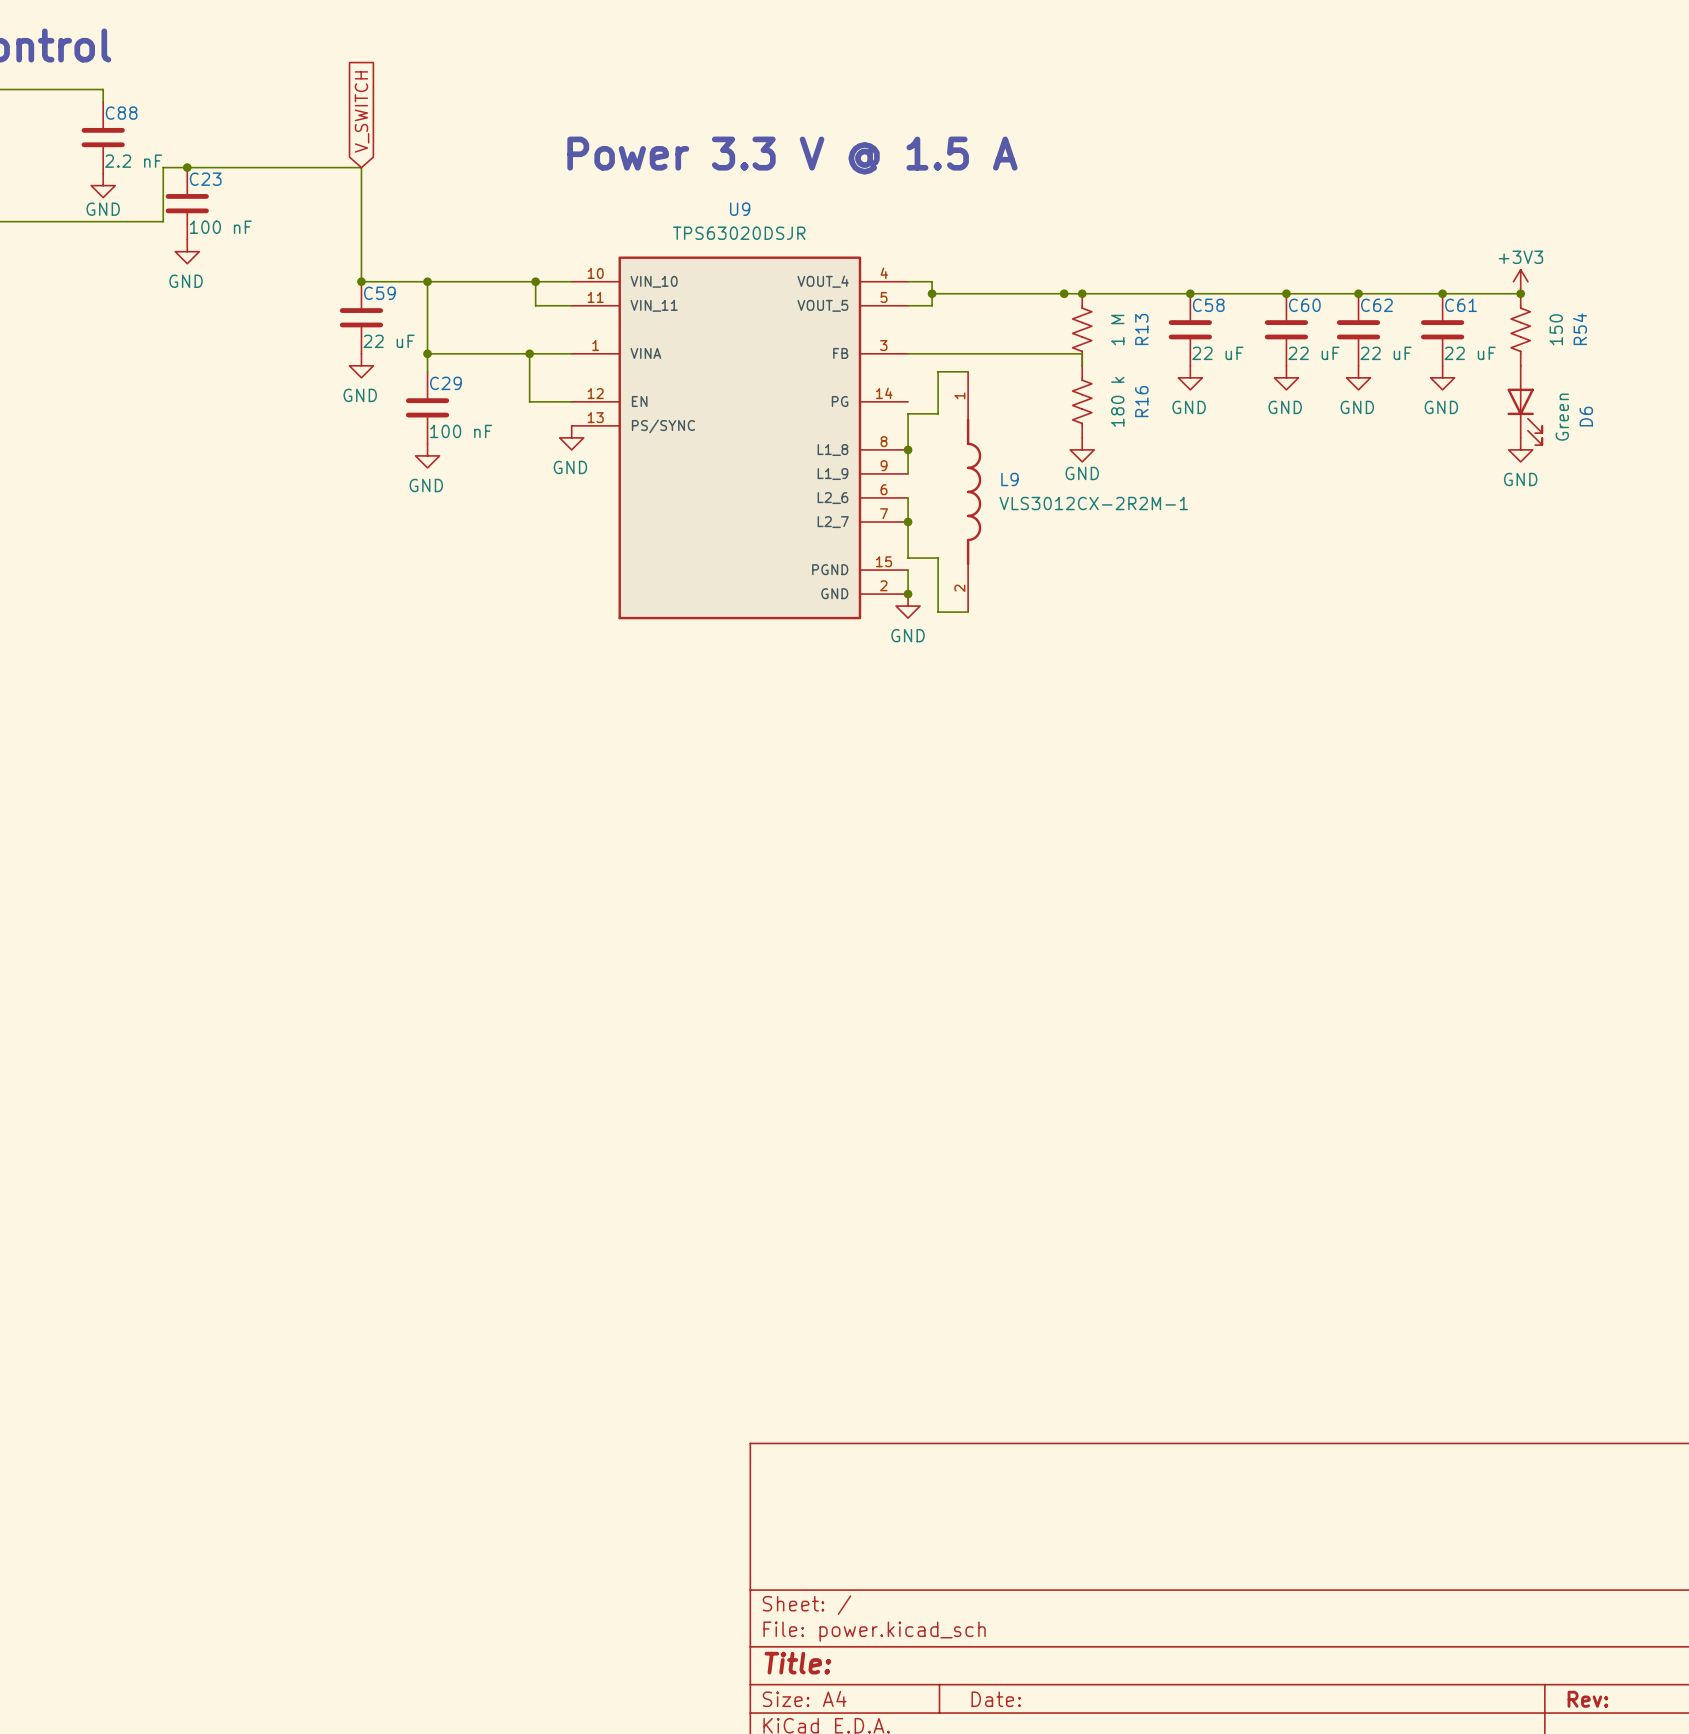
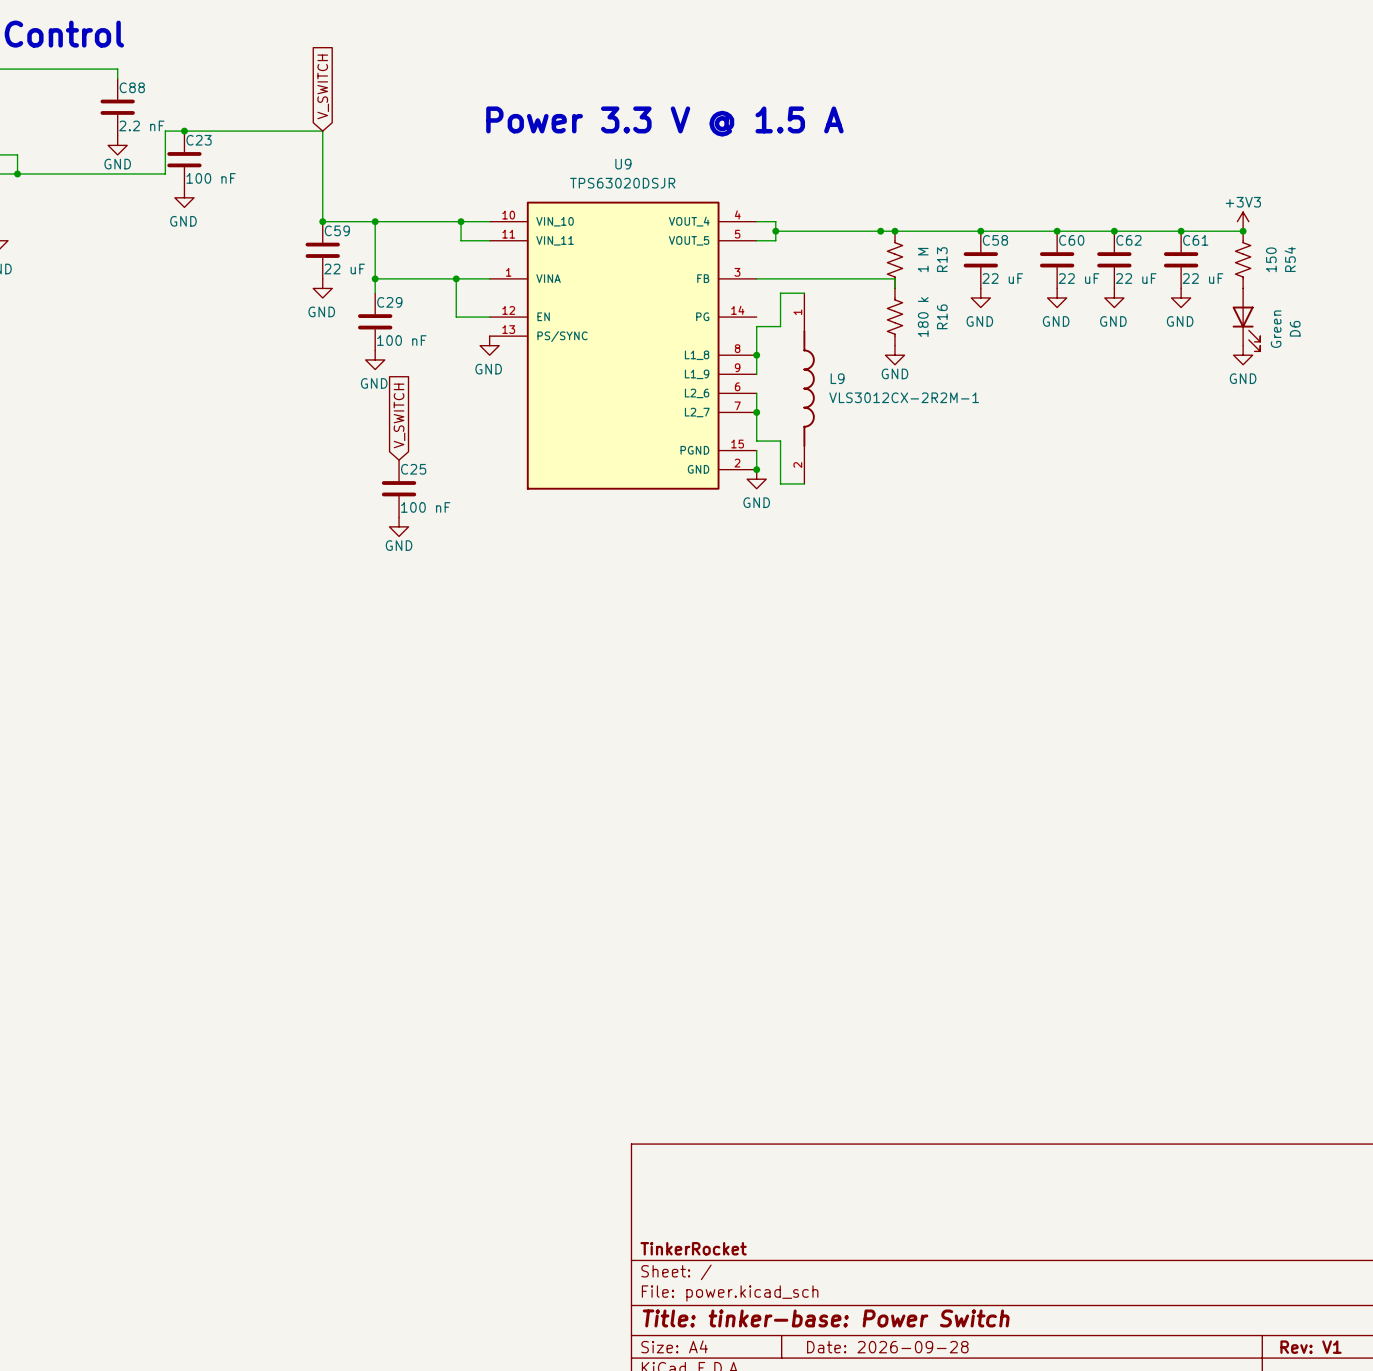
global label: none -> V_SWITCH (399, 415)
C25: none -> 100 nF (399, 488)
power symbol: none -> GND (399, 526)
title block: none -> TinkerRocket (693, 1248)
title block: Title: (797, 1663) -> Title: tinker-base: Power Switch (826, 1318)
title block: Date: (996, 1699) -> Date: 2026-09-28 (887, 1347)
title block: Rev: (1587, 1699) -> Rev: V1 (1310, 1347)

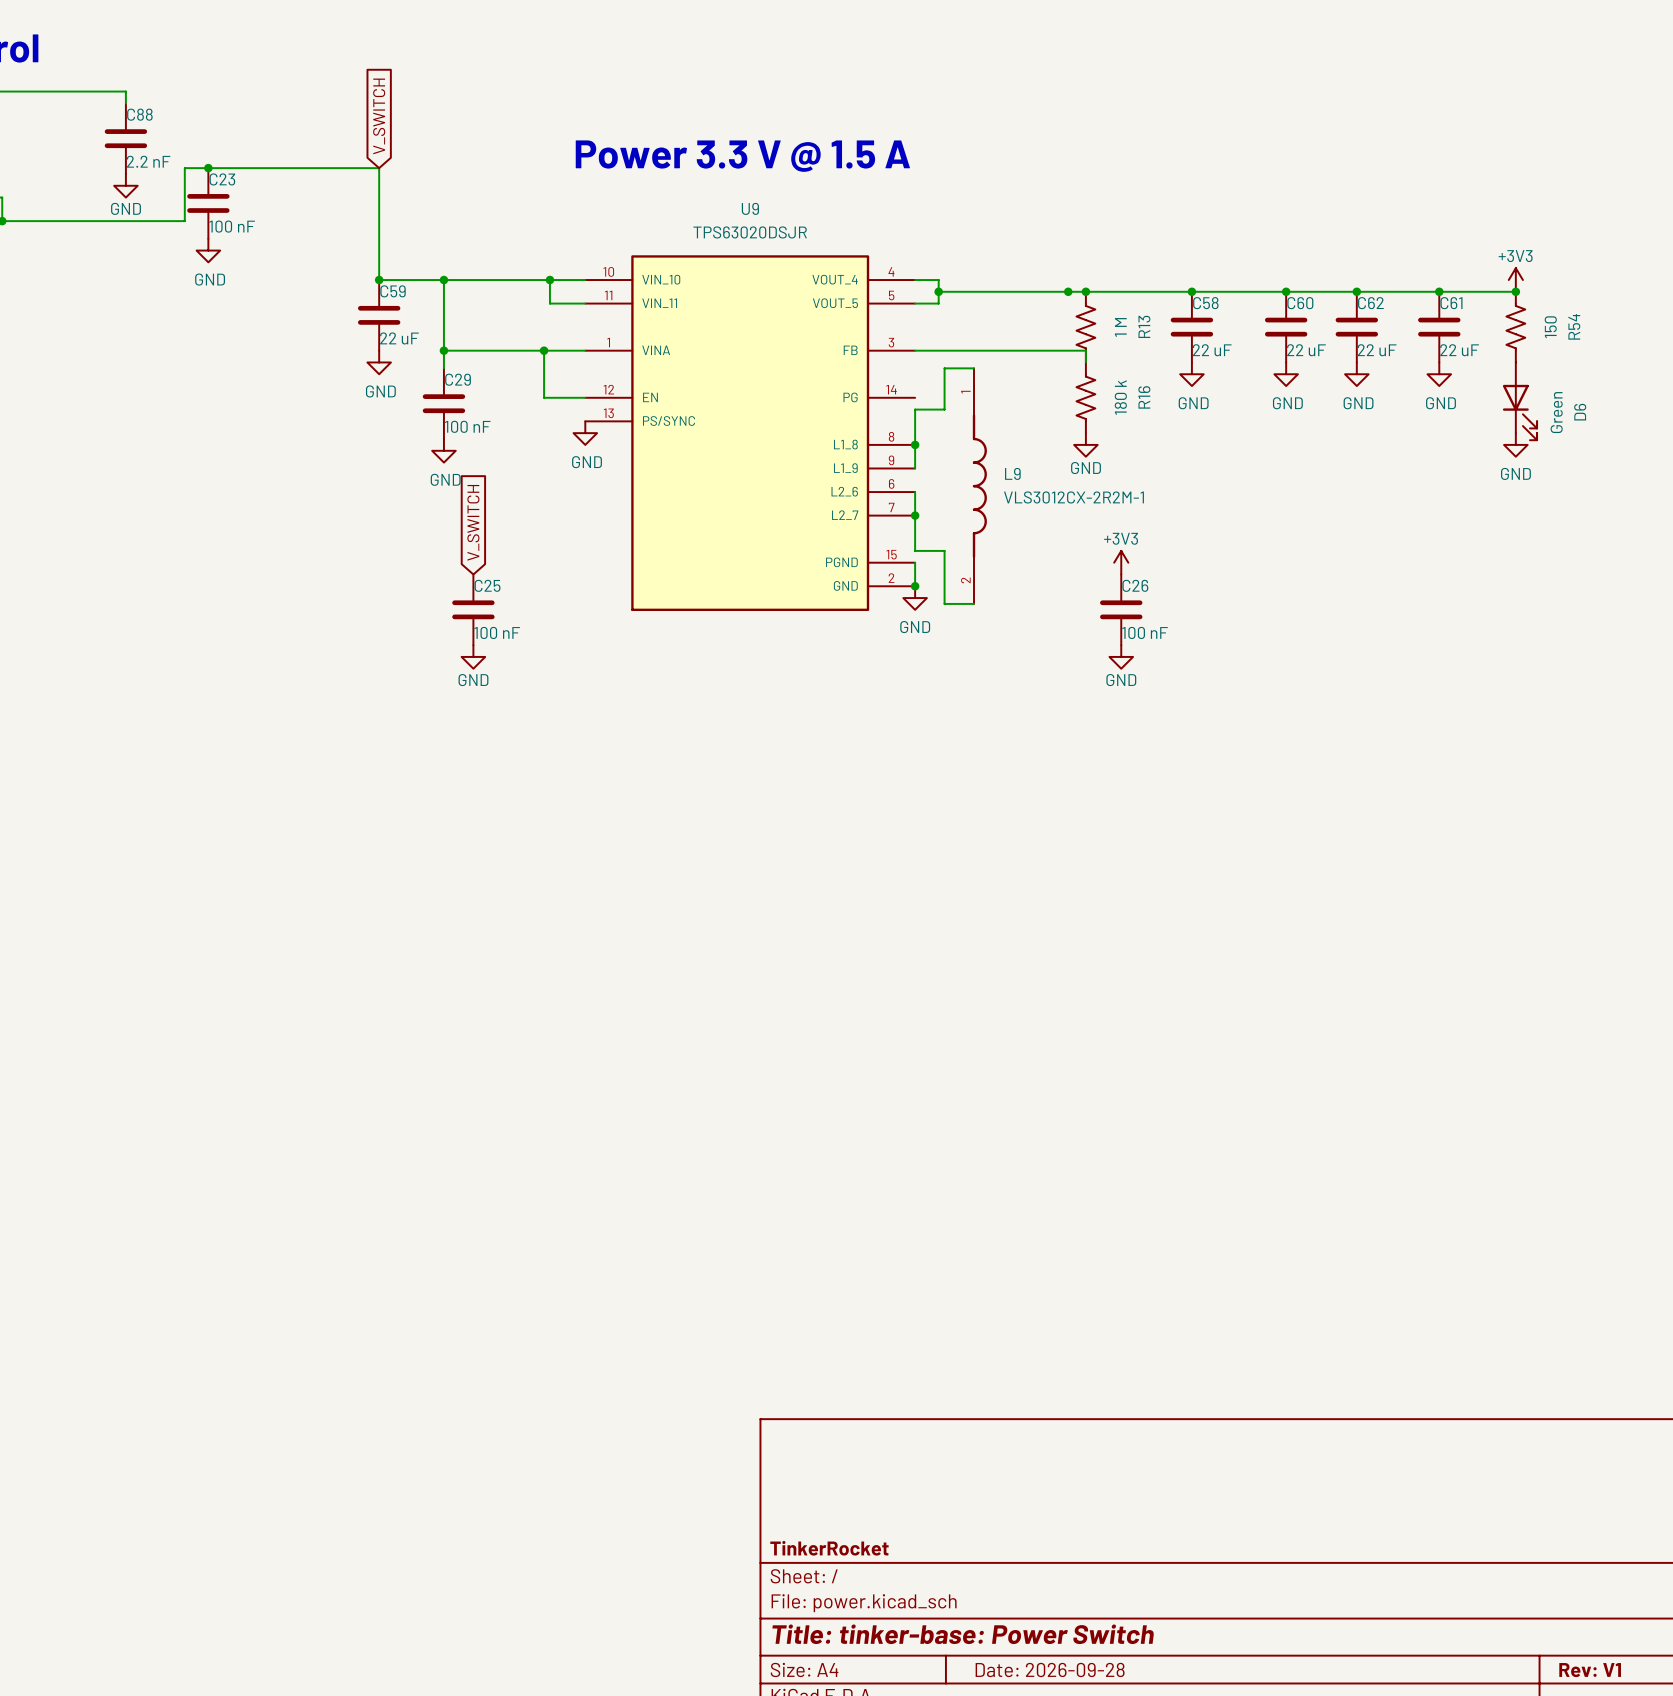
power symbol: none -> +3V3 (1121, 562)
C26: none -> 100 nF (1121, 609)
power symbol: none -> GND (1121, 656)

